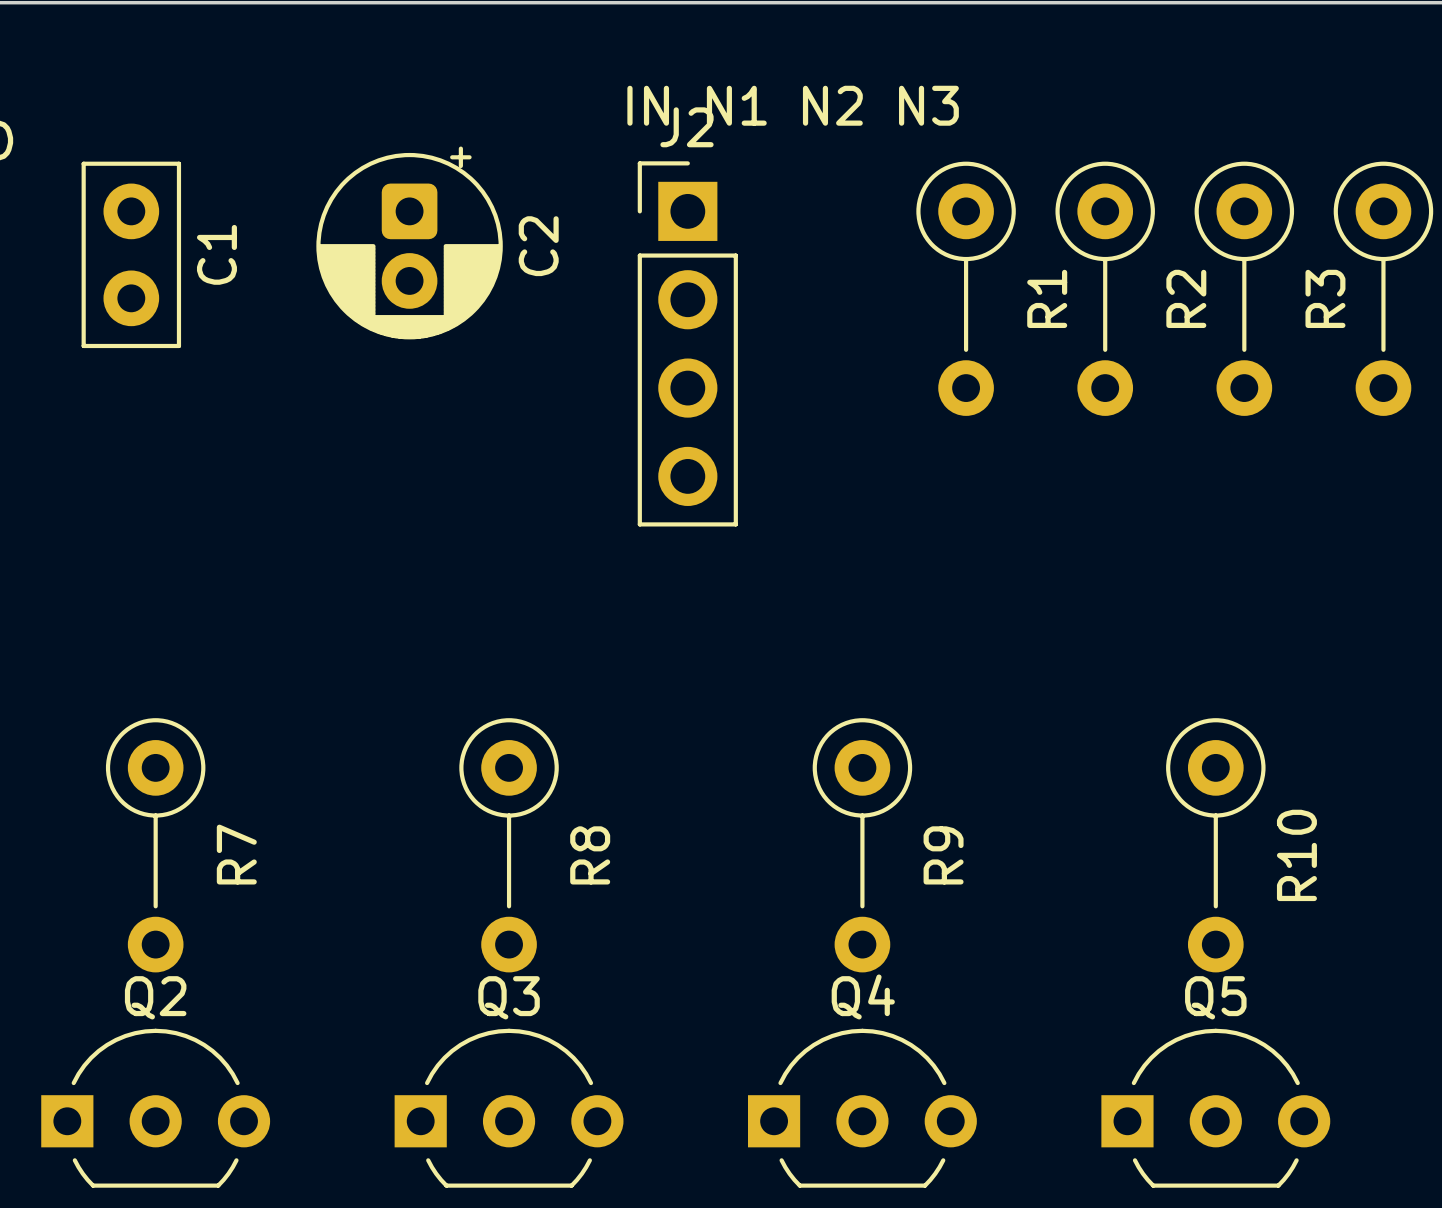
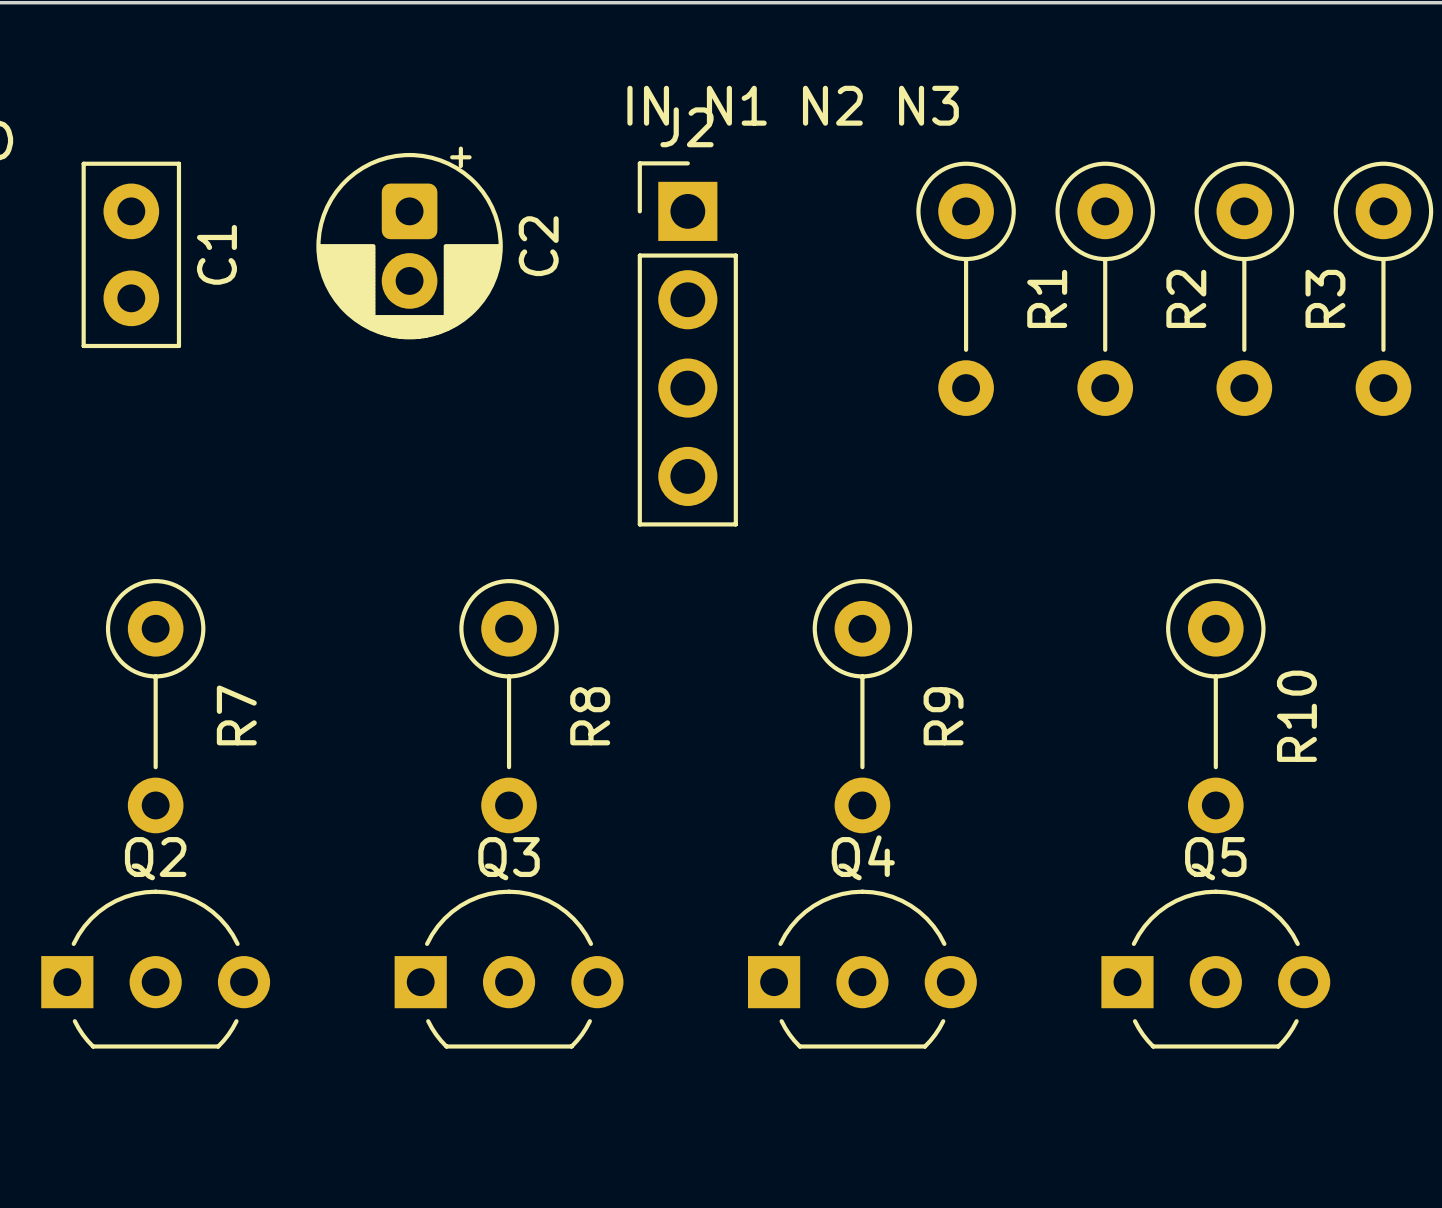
R7 position: (155, 845) -> (155, 706)
R8 position: (509, 845) -> (509, 706)
R9 position: (862, 845) -> (862, 706)
R10 position: (1215, 845) -> (1215, 706)
Q2 position: (155, 1108) -> (155, 969)
Q3 position: (509, 1108) -> (509, 969)
Q4 position: (862, 1108) -> (862, 969)
Q5 position: (1215, 1108) -> (1215, 969)

